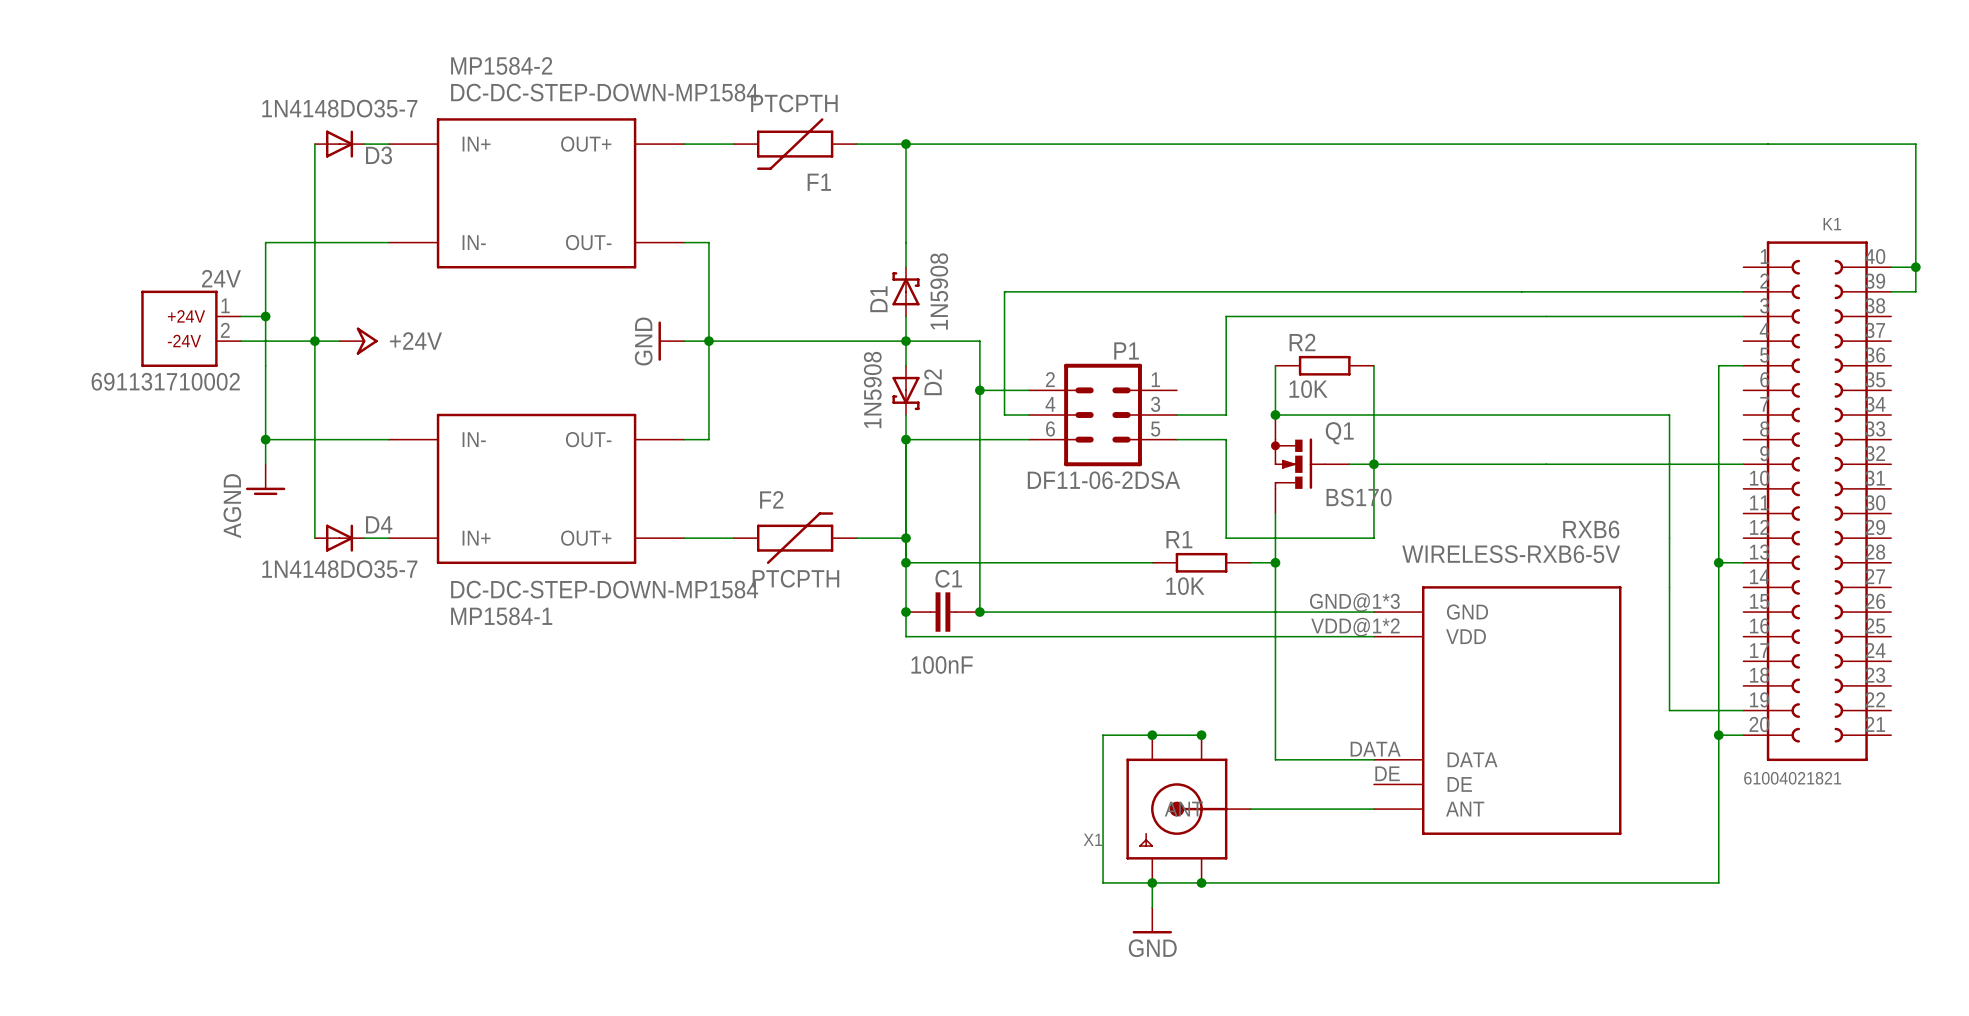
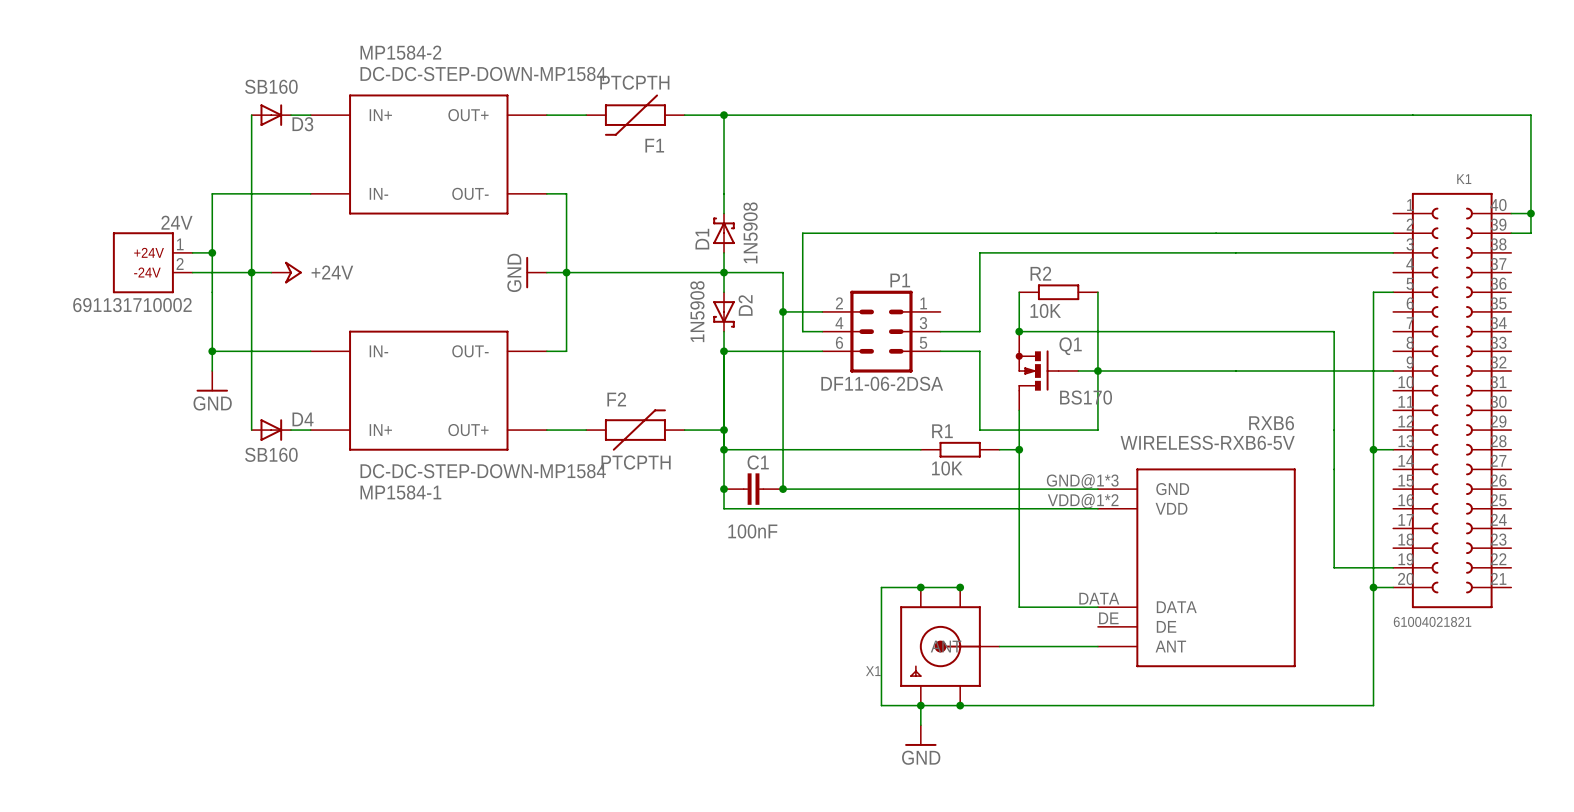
D3 value: 1N4148DO35-7 (339, 108) -> SB160 (271, 86)
power symbol: AGND (265, 479) -> GND (212, 381)
D4 value: 1N4148DO35-7 (339, 569) -> SB160 (271, 454)

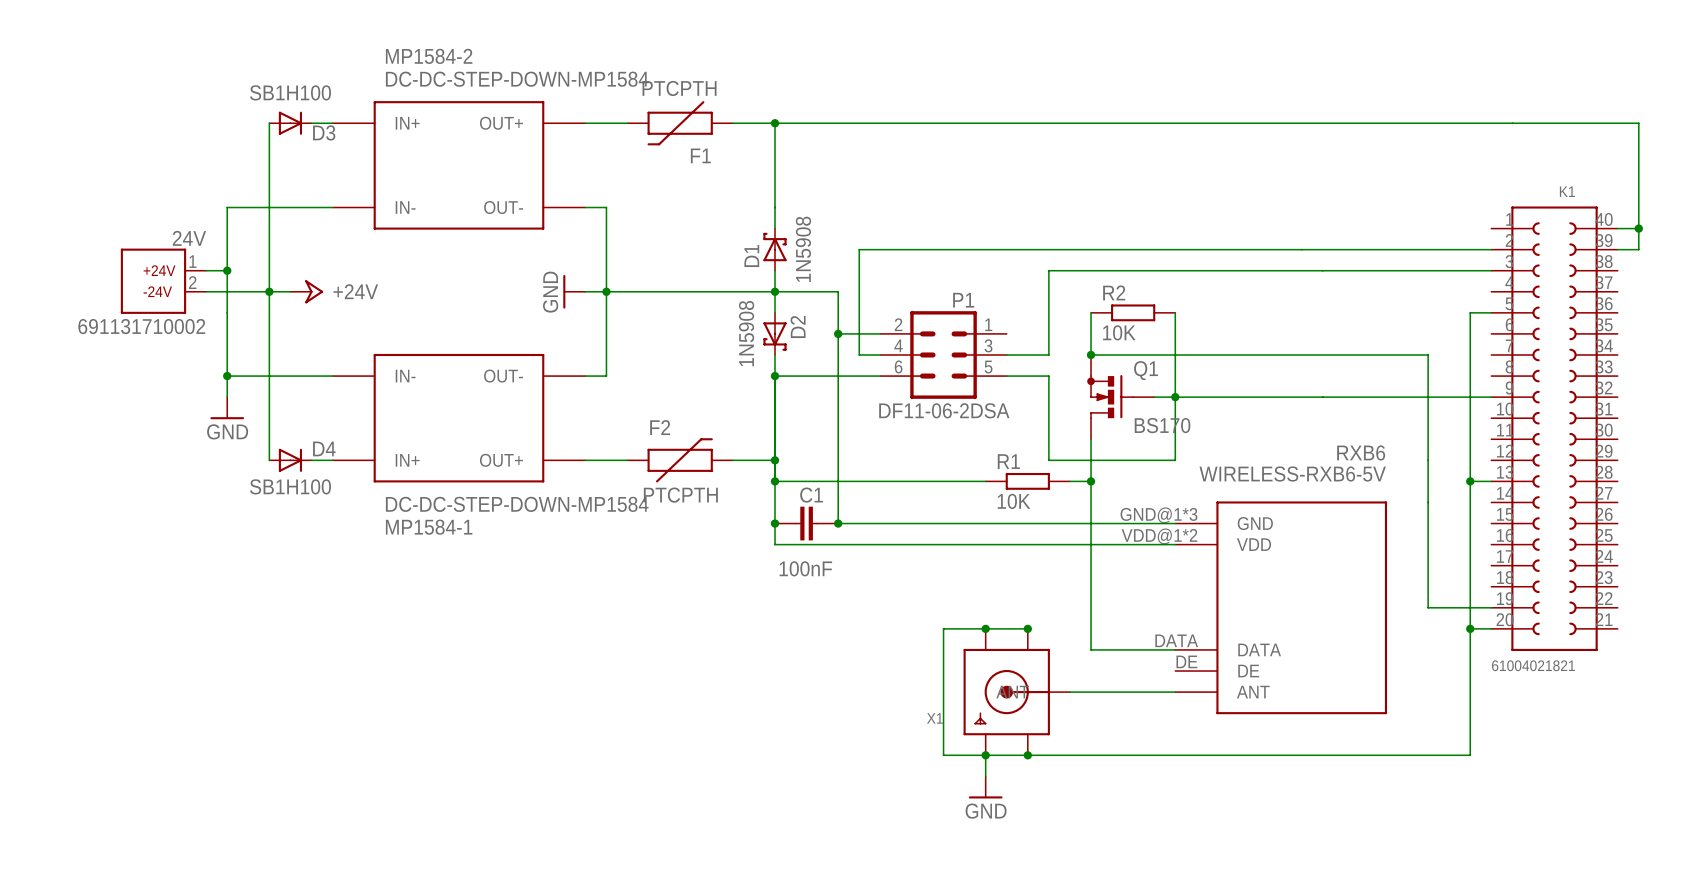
D3 value: SB160 (271, 86) -> SB1H100 (290, 92)
D4 value: SB160 (271, 454) -> SB1H100 (290, 486)

